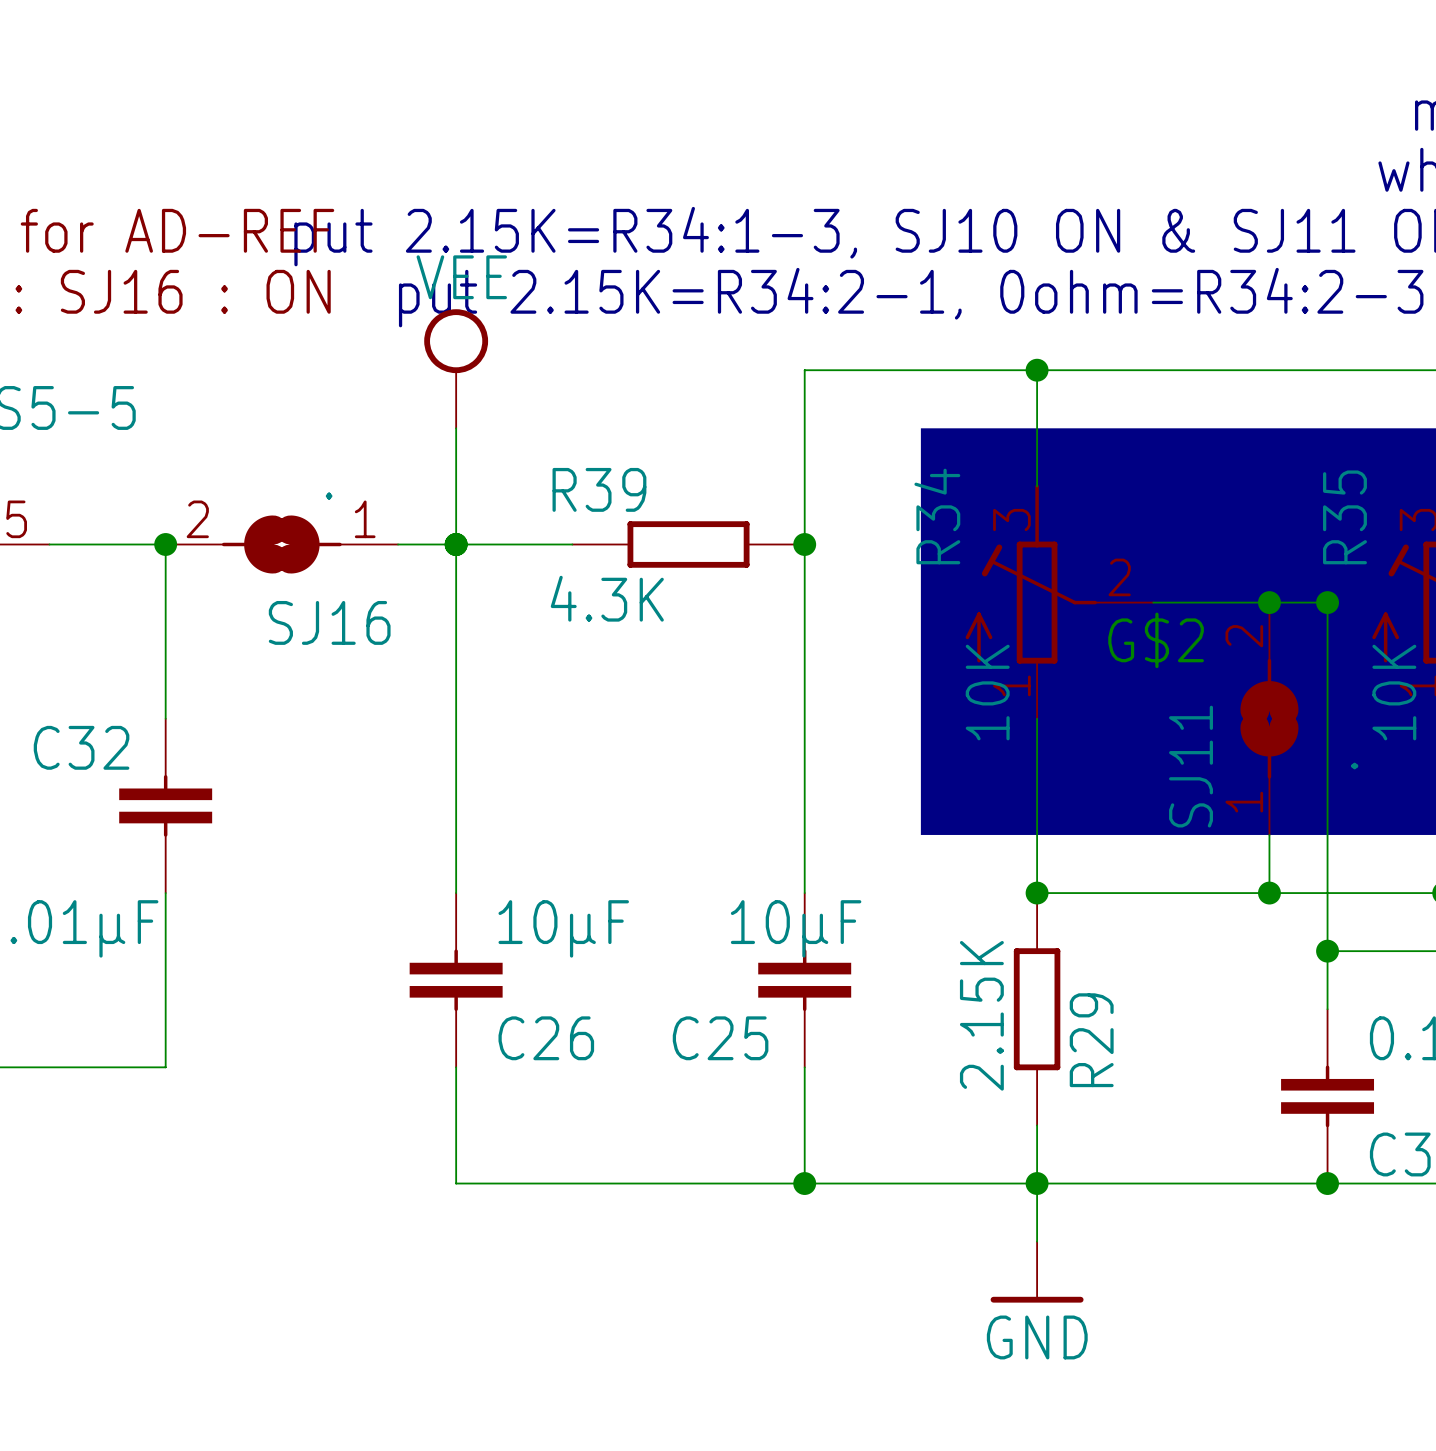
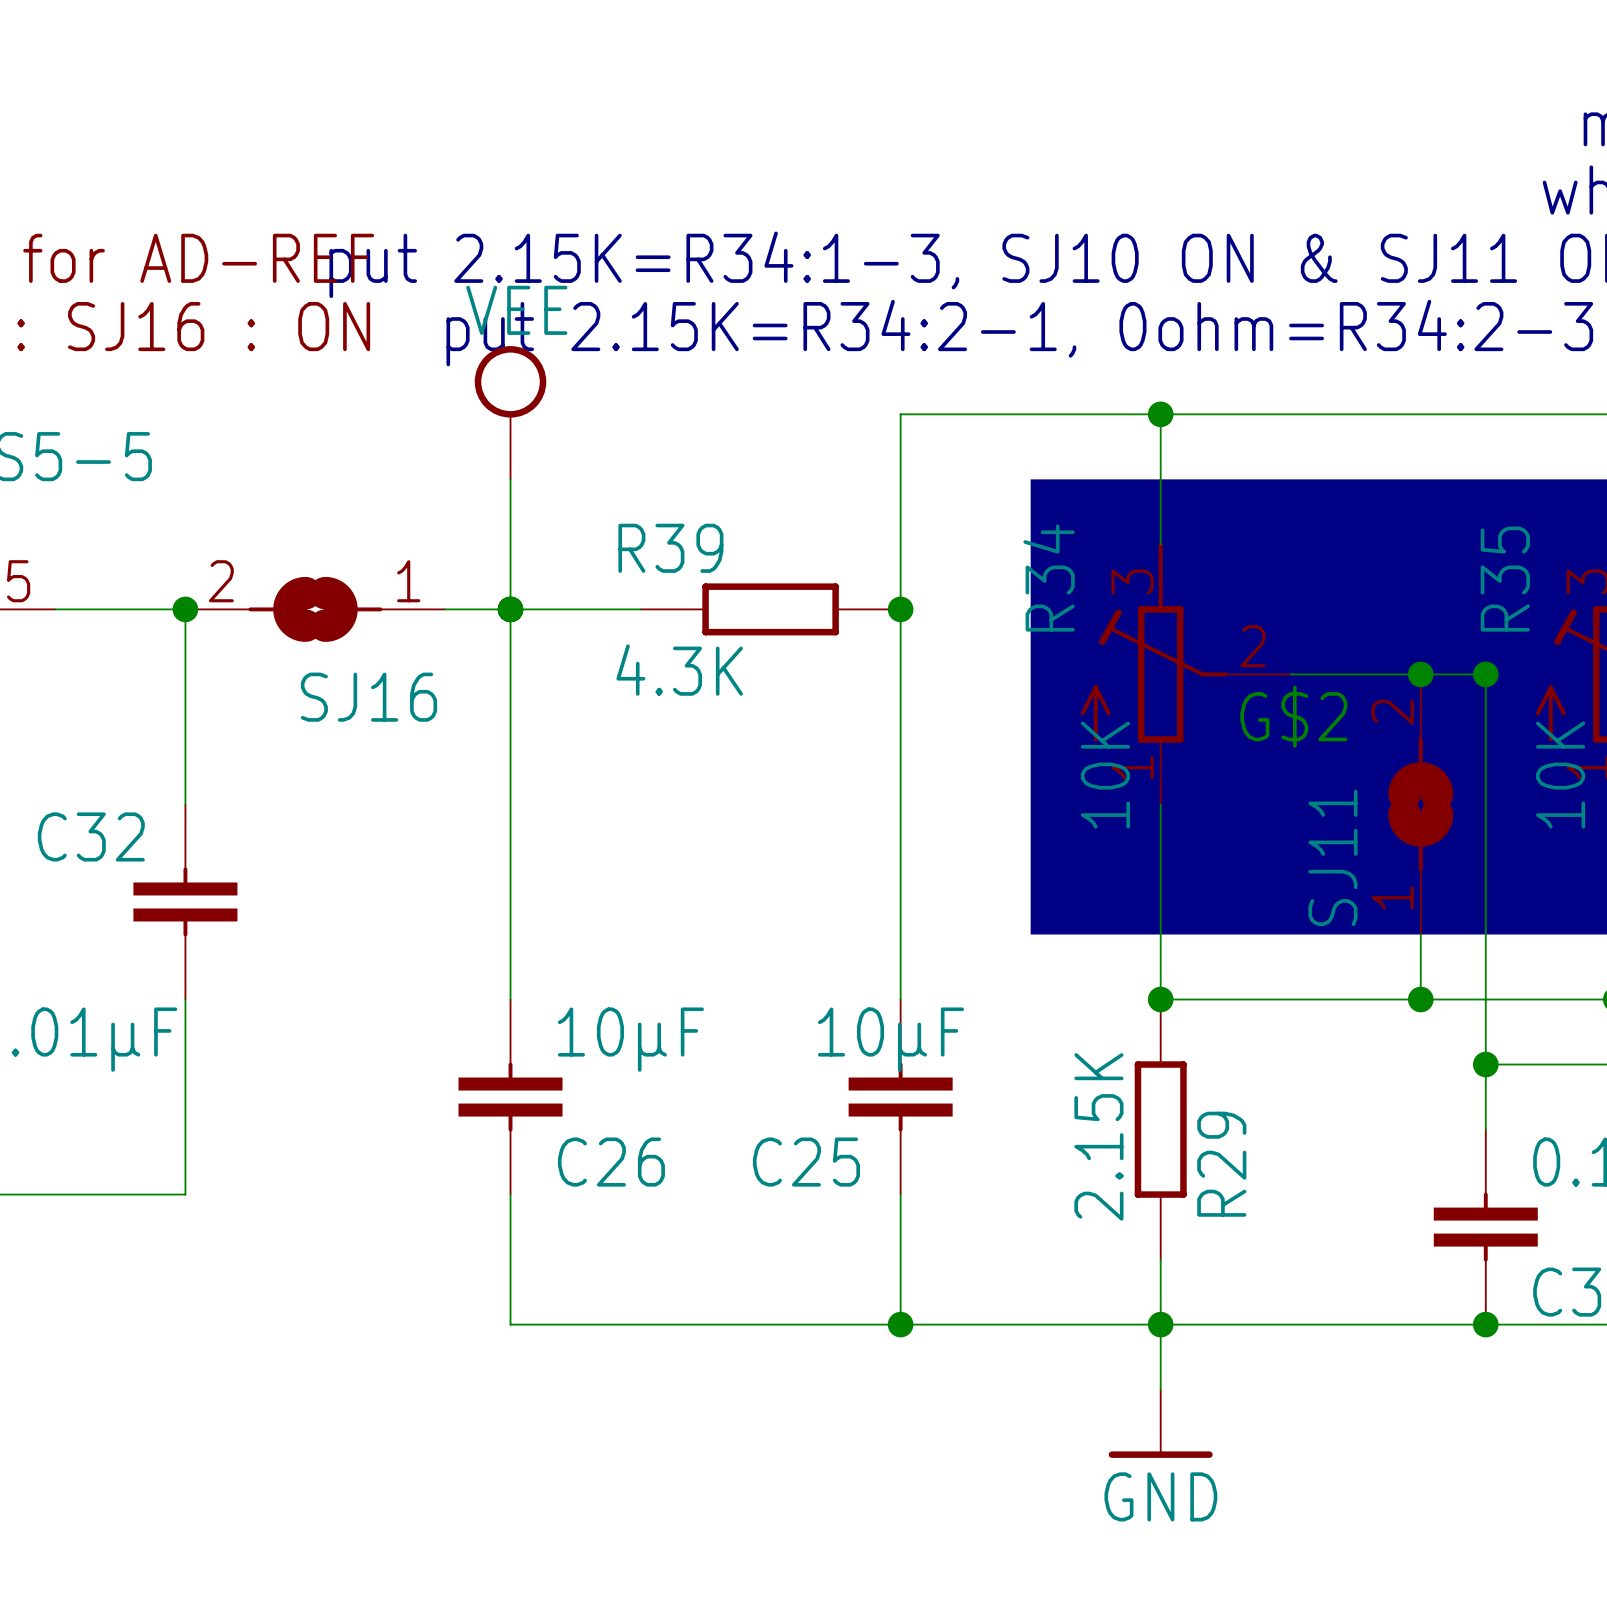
SJ16 value: . (329, 496) -> none
SJ11 value: . (1354, 766) -> none

